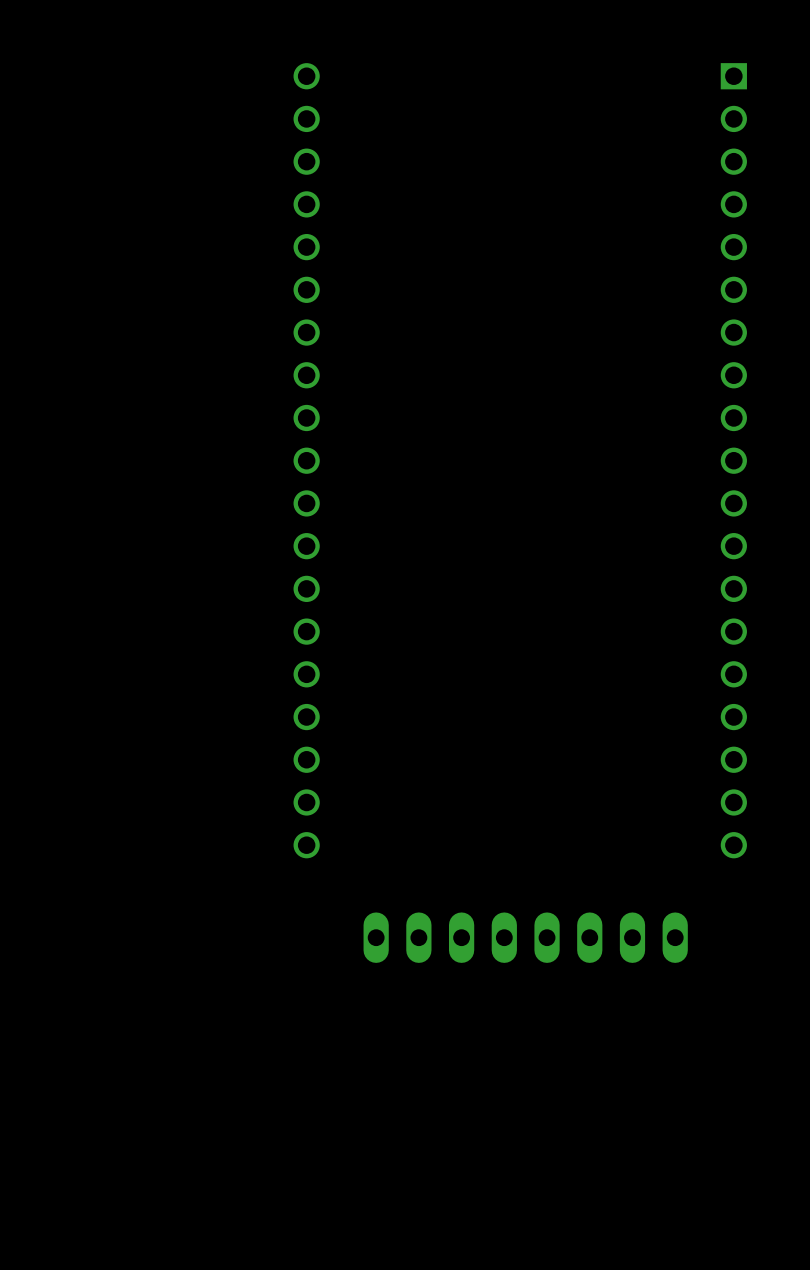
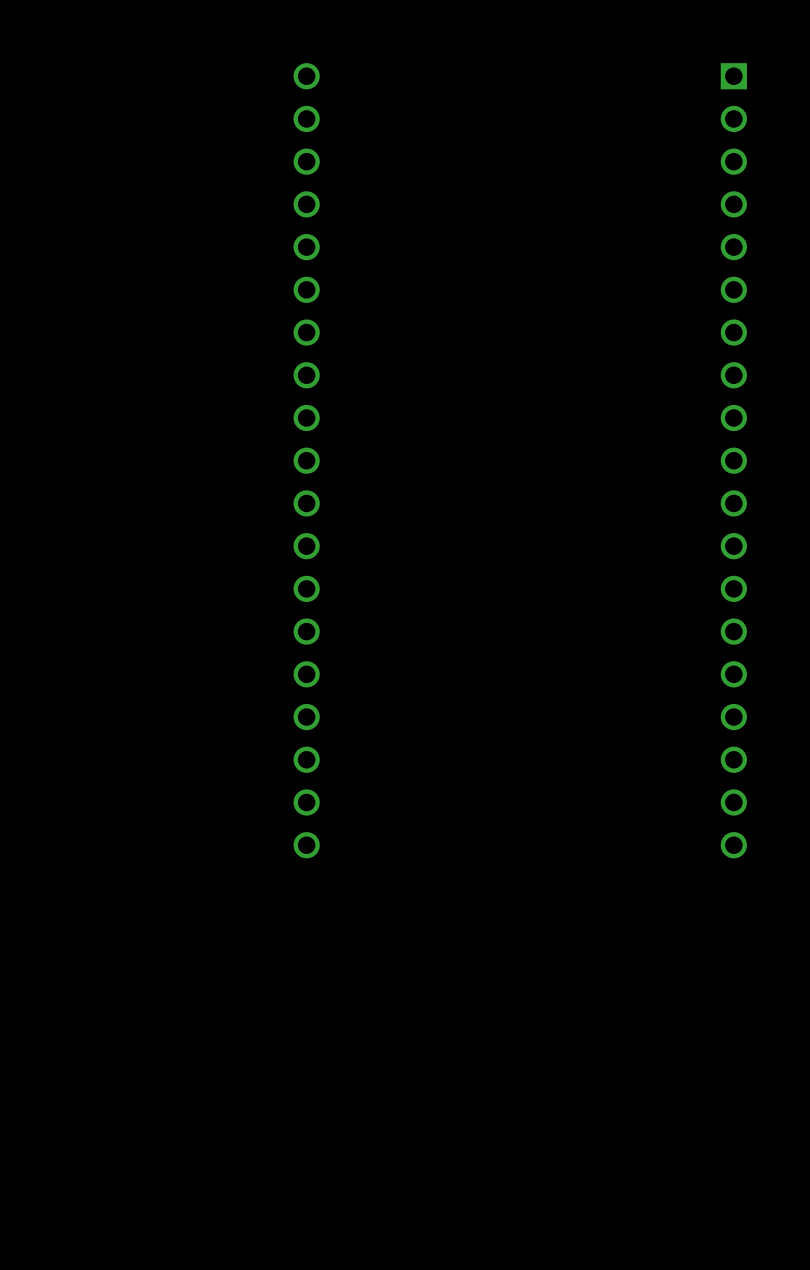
part: (525, 937) -> none

